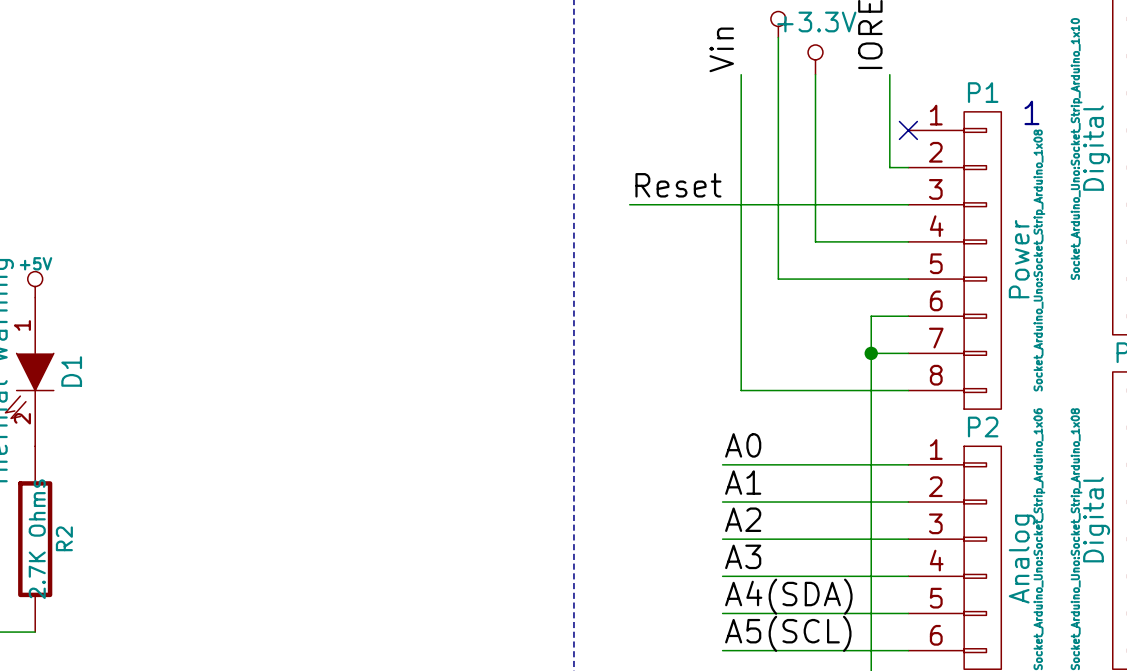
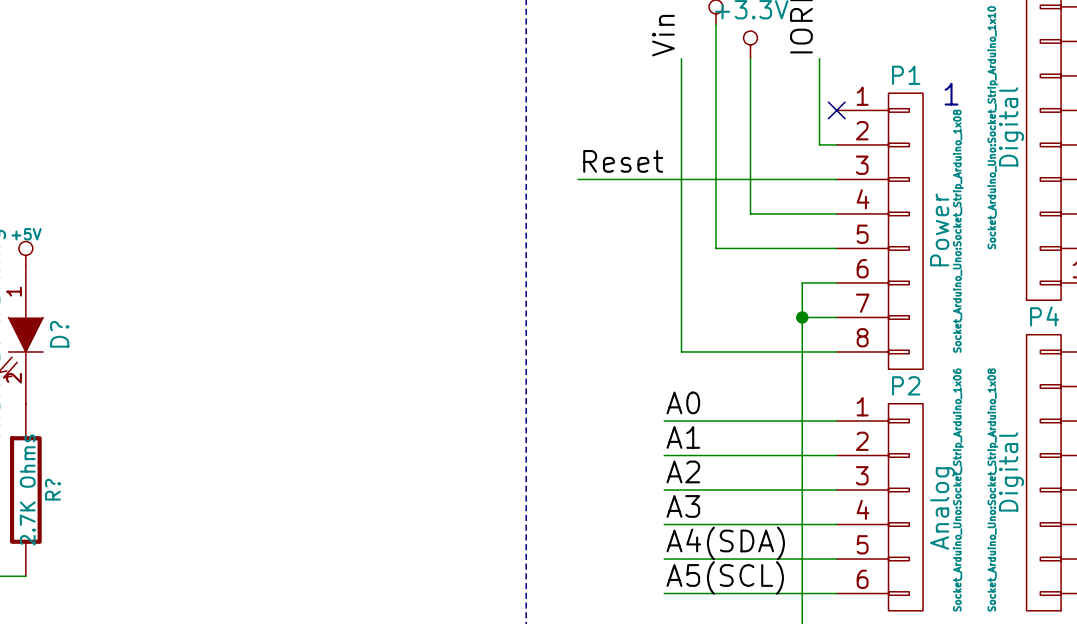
D1 name: D1 (71, 371) -> D? (59, 334)
R2 name: R2 (64, 538) -> R? (52, 489)

